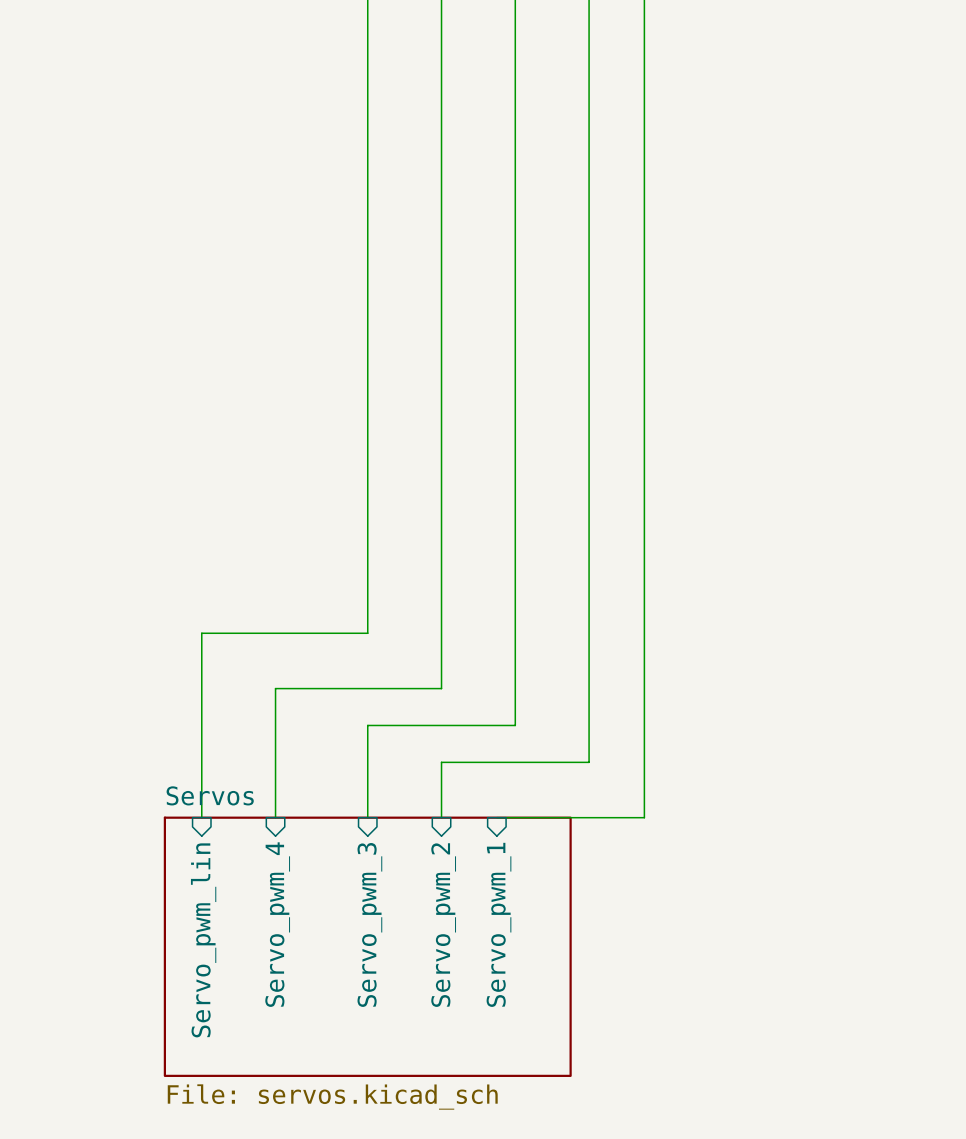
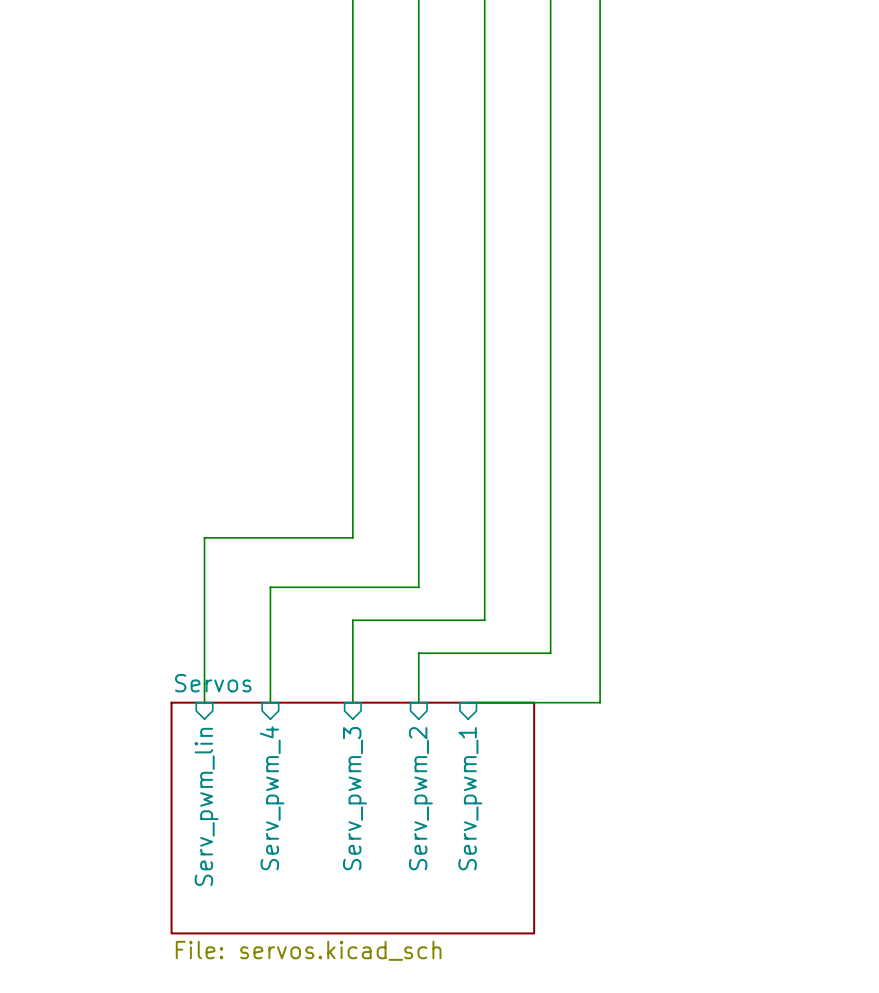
sheet pin: Servo_pwm_4 (277, 924) -> Serv_pwm_4 (272, 798)
sheet pin: Servo_pwm_3 (369, 924) -> Serv_pwm_3 (354, 798)
sheet pin: Servo_pwm_1 (498, 924) -> Serv_pwm_1 (470, 798)
sheet pin: Servo_pwm_2 (443, 925) -> Serv_pwm_2 (420, 798)
sheet pin: Servo_pwm_lin (203, 940) -> Serv_pwm_lin (206, 806)

